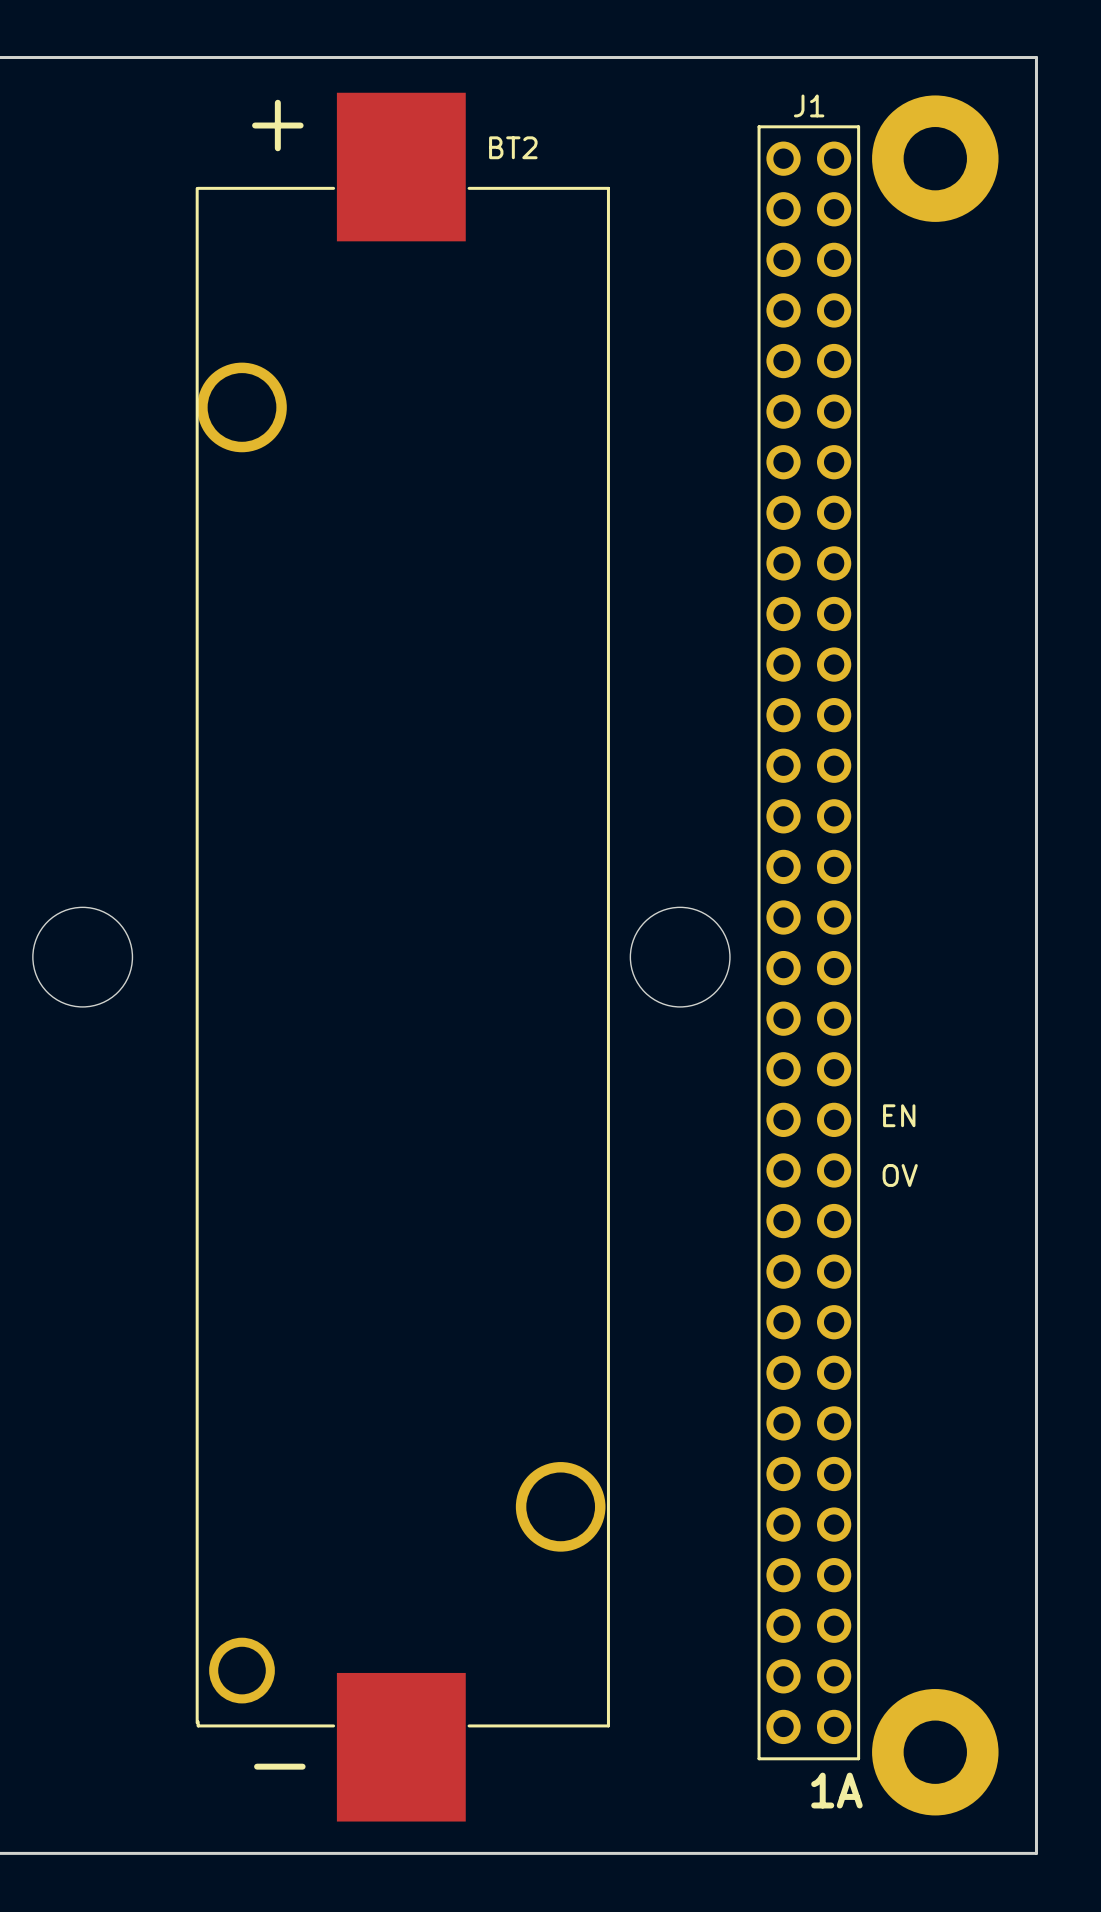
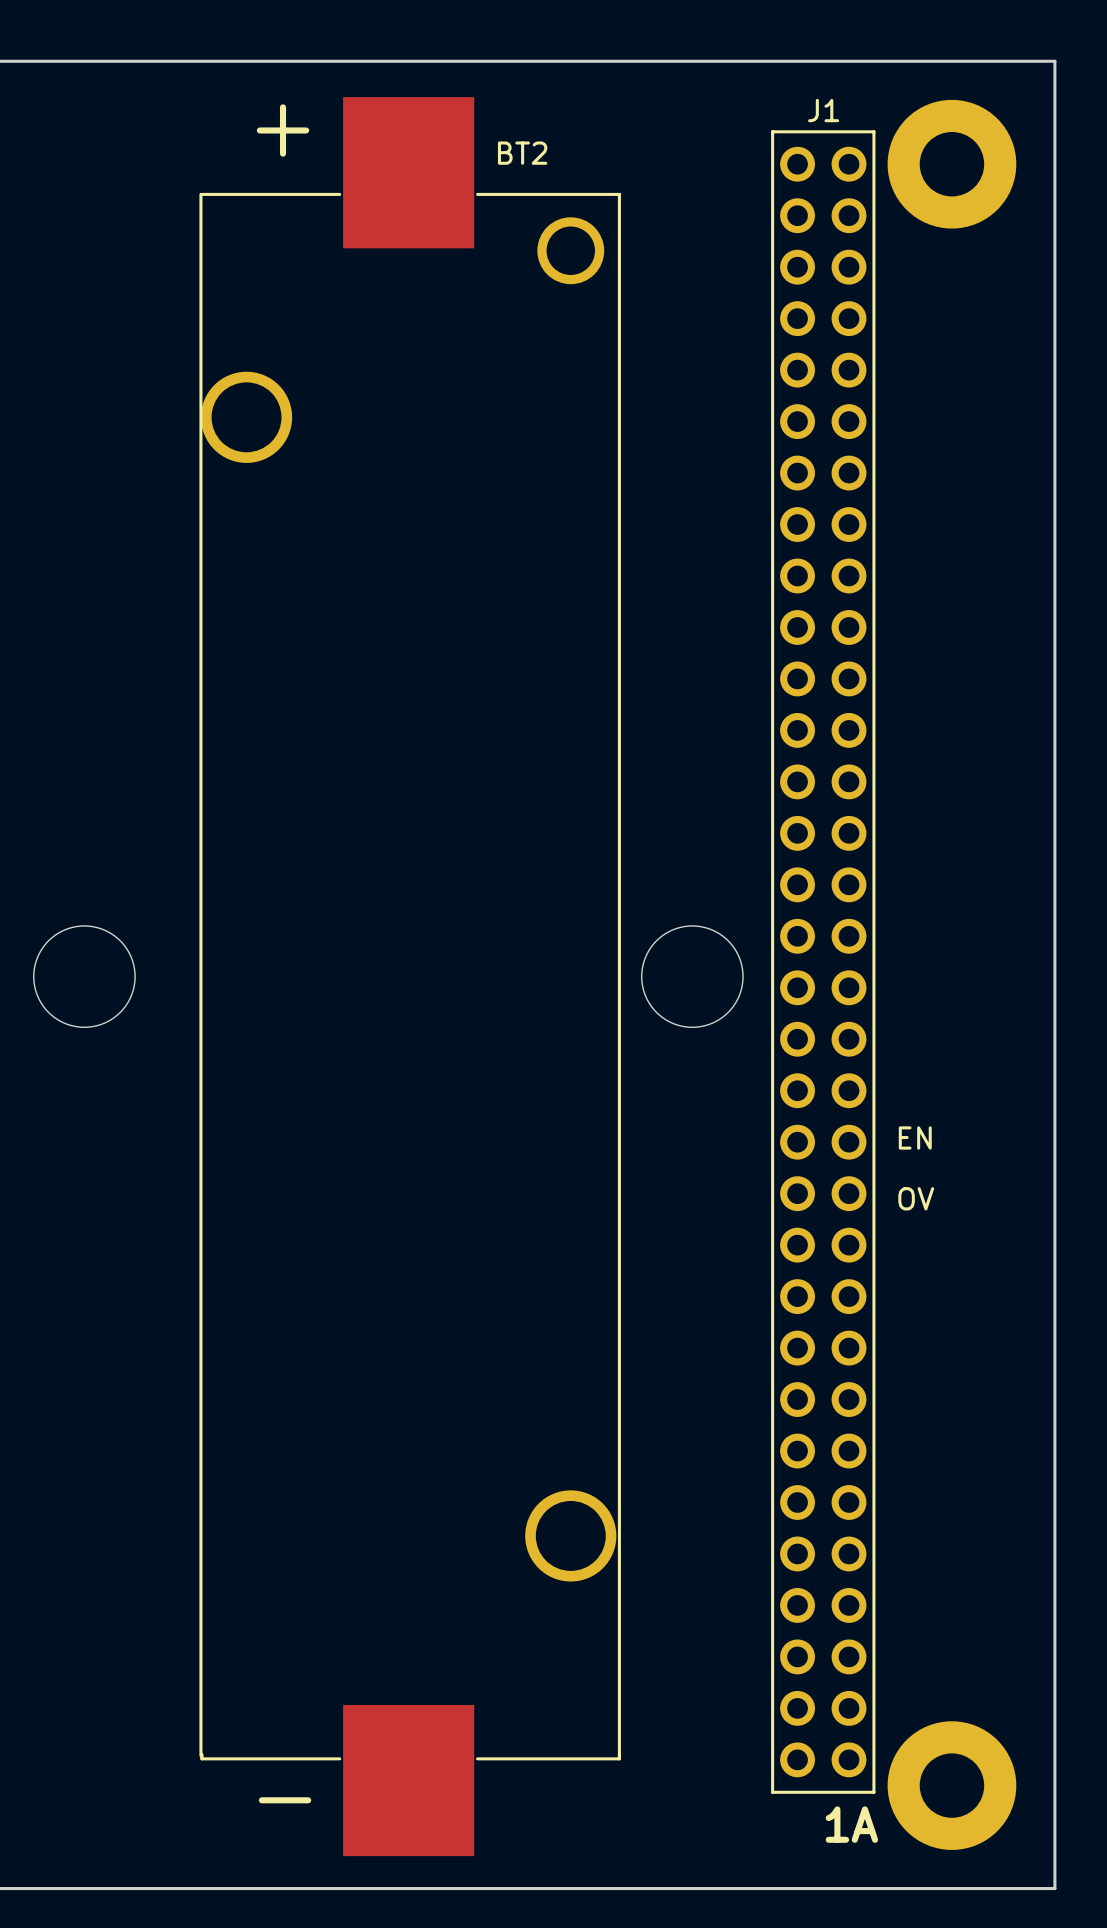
BT2 footprint: [195, 92, 610, 1822] -> [199, 97, 621, 1857]

